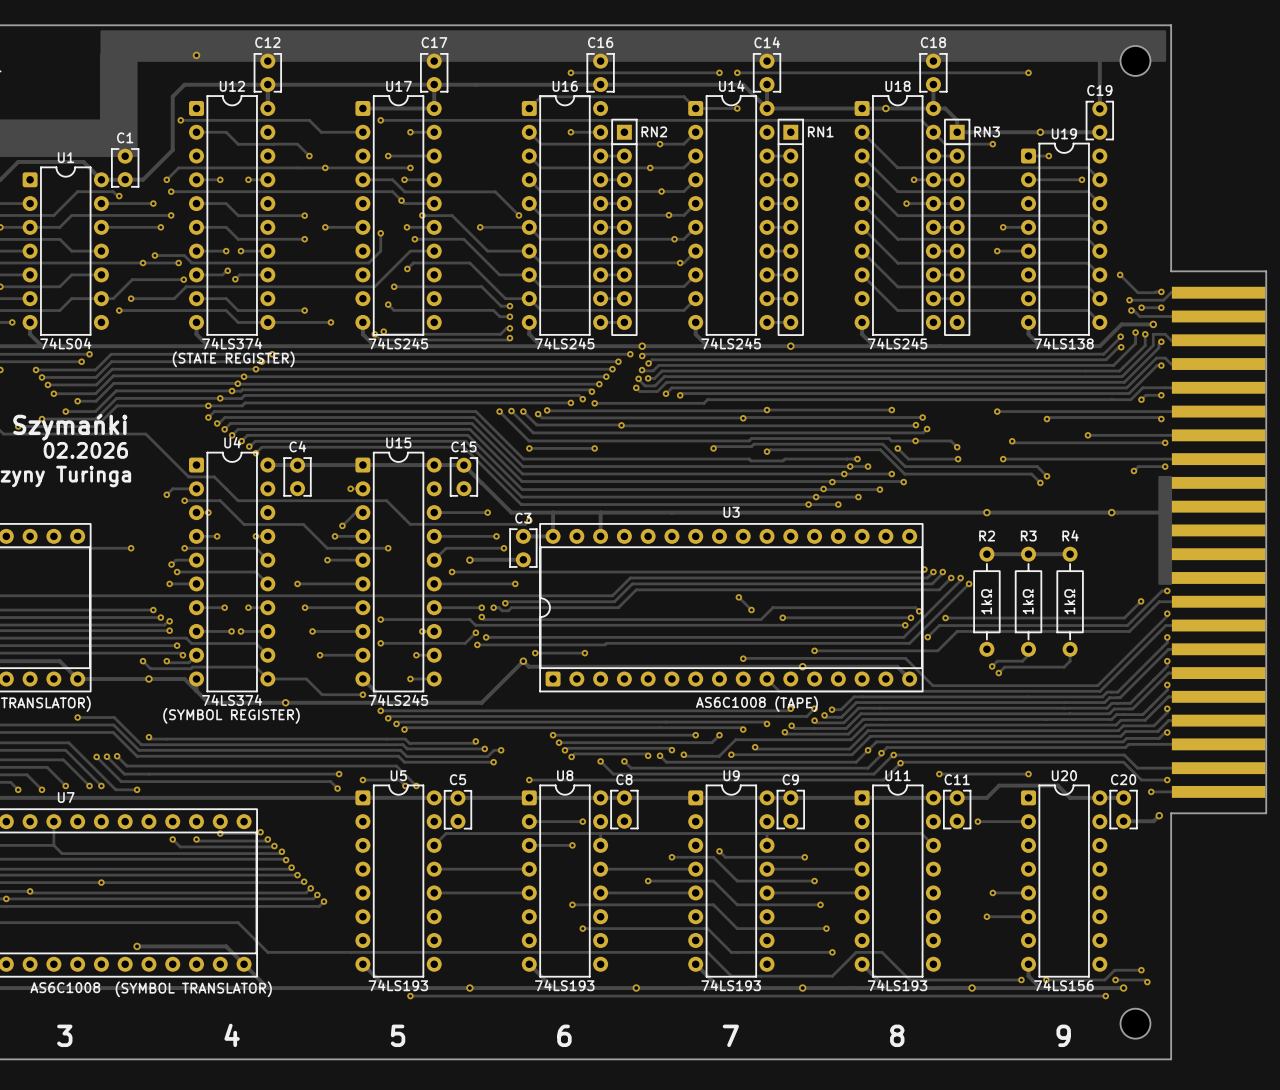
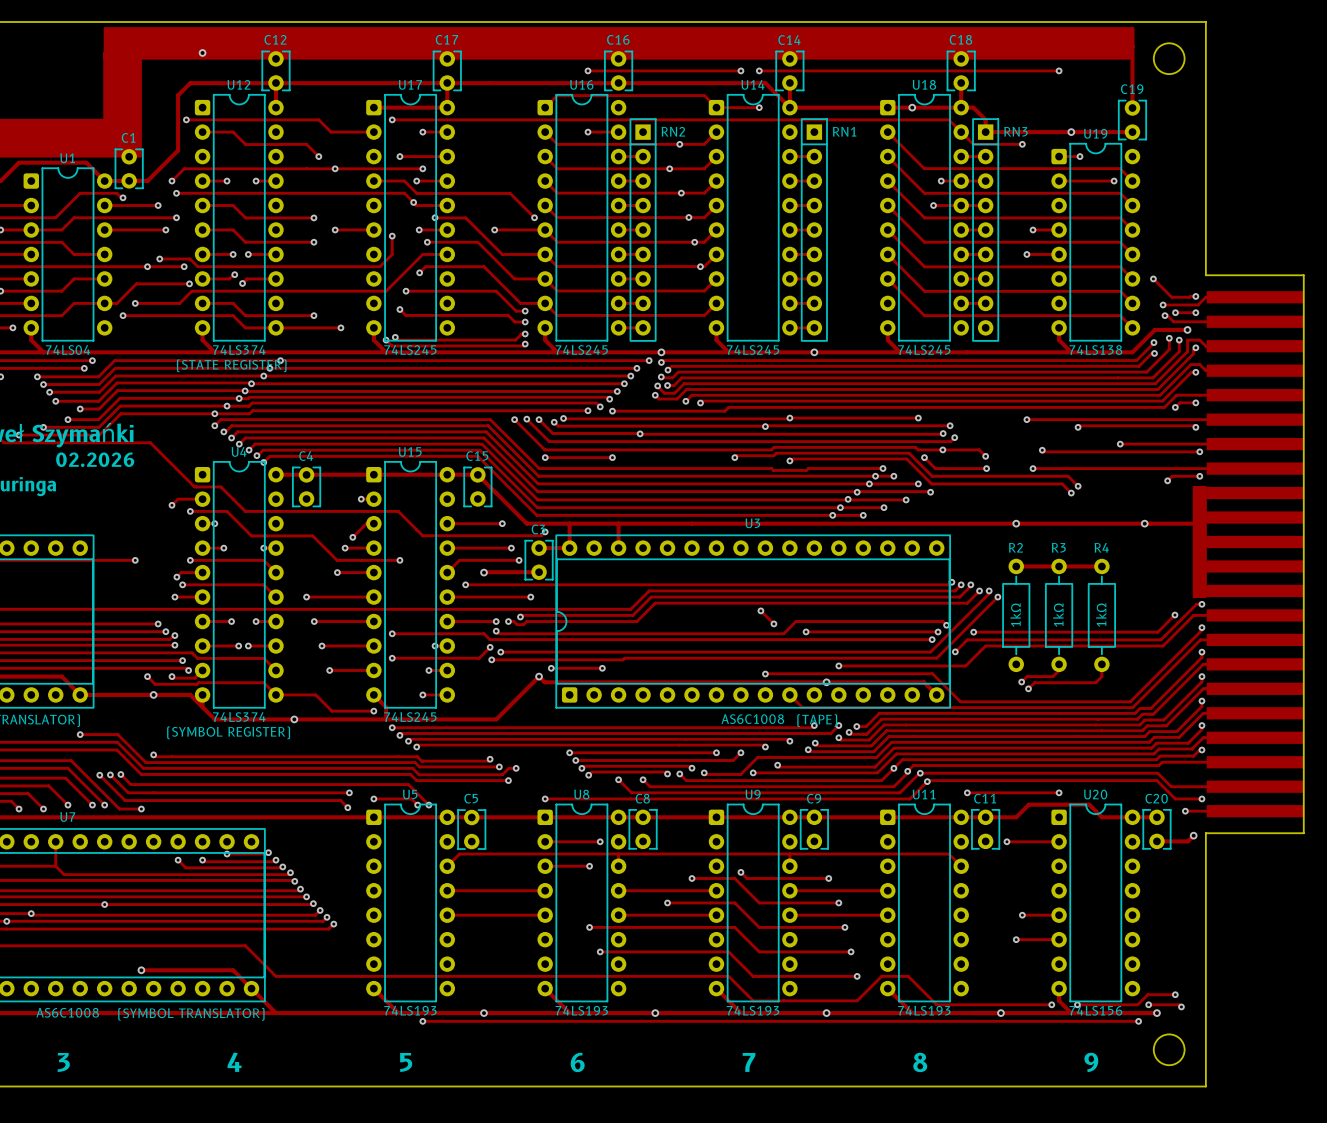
drawing: [100, 30, 1167, 62] -> none
drawing: none -> [103, 27, 1134, 60]

